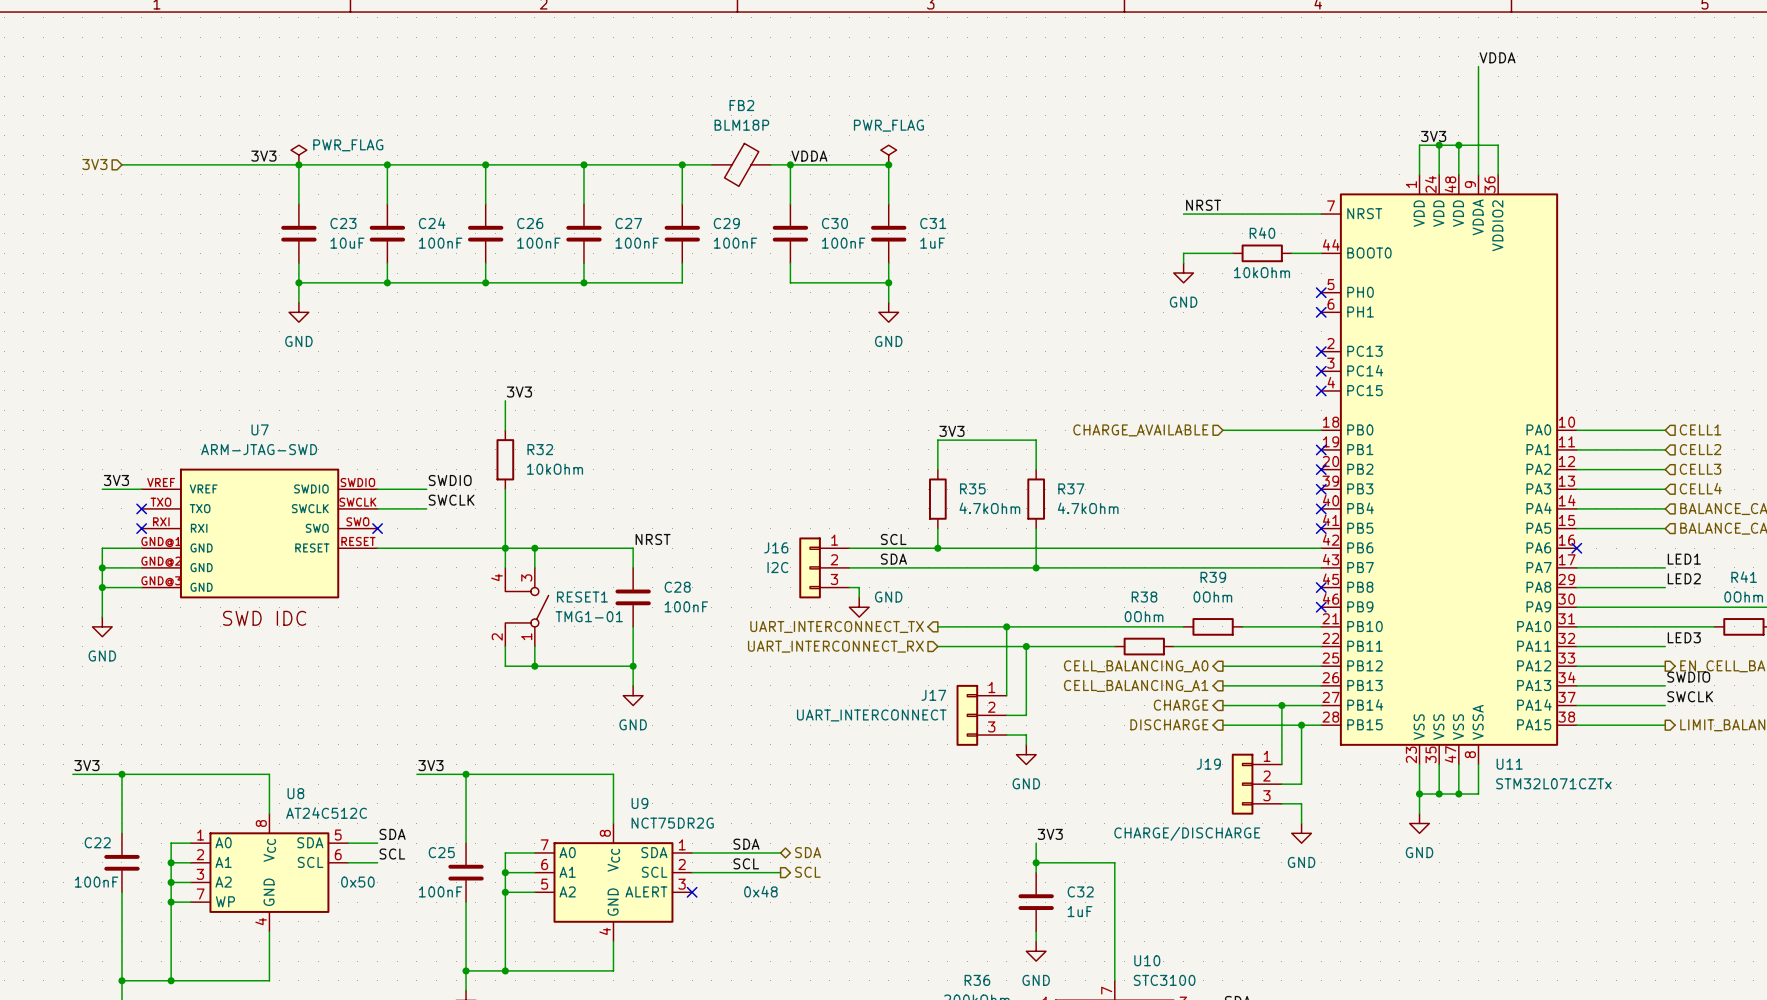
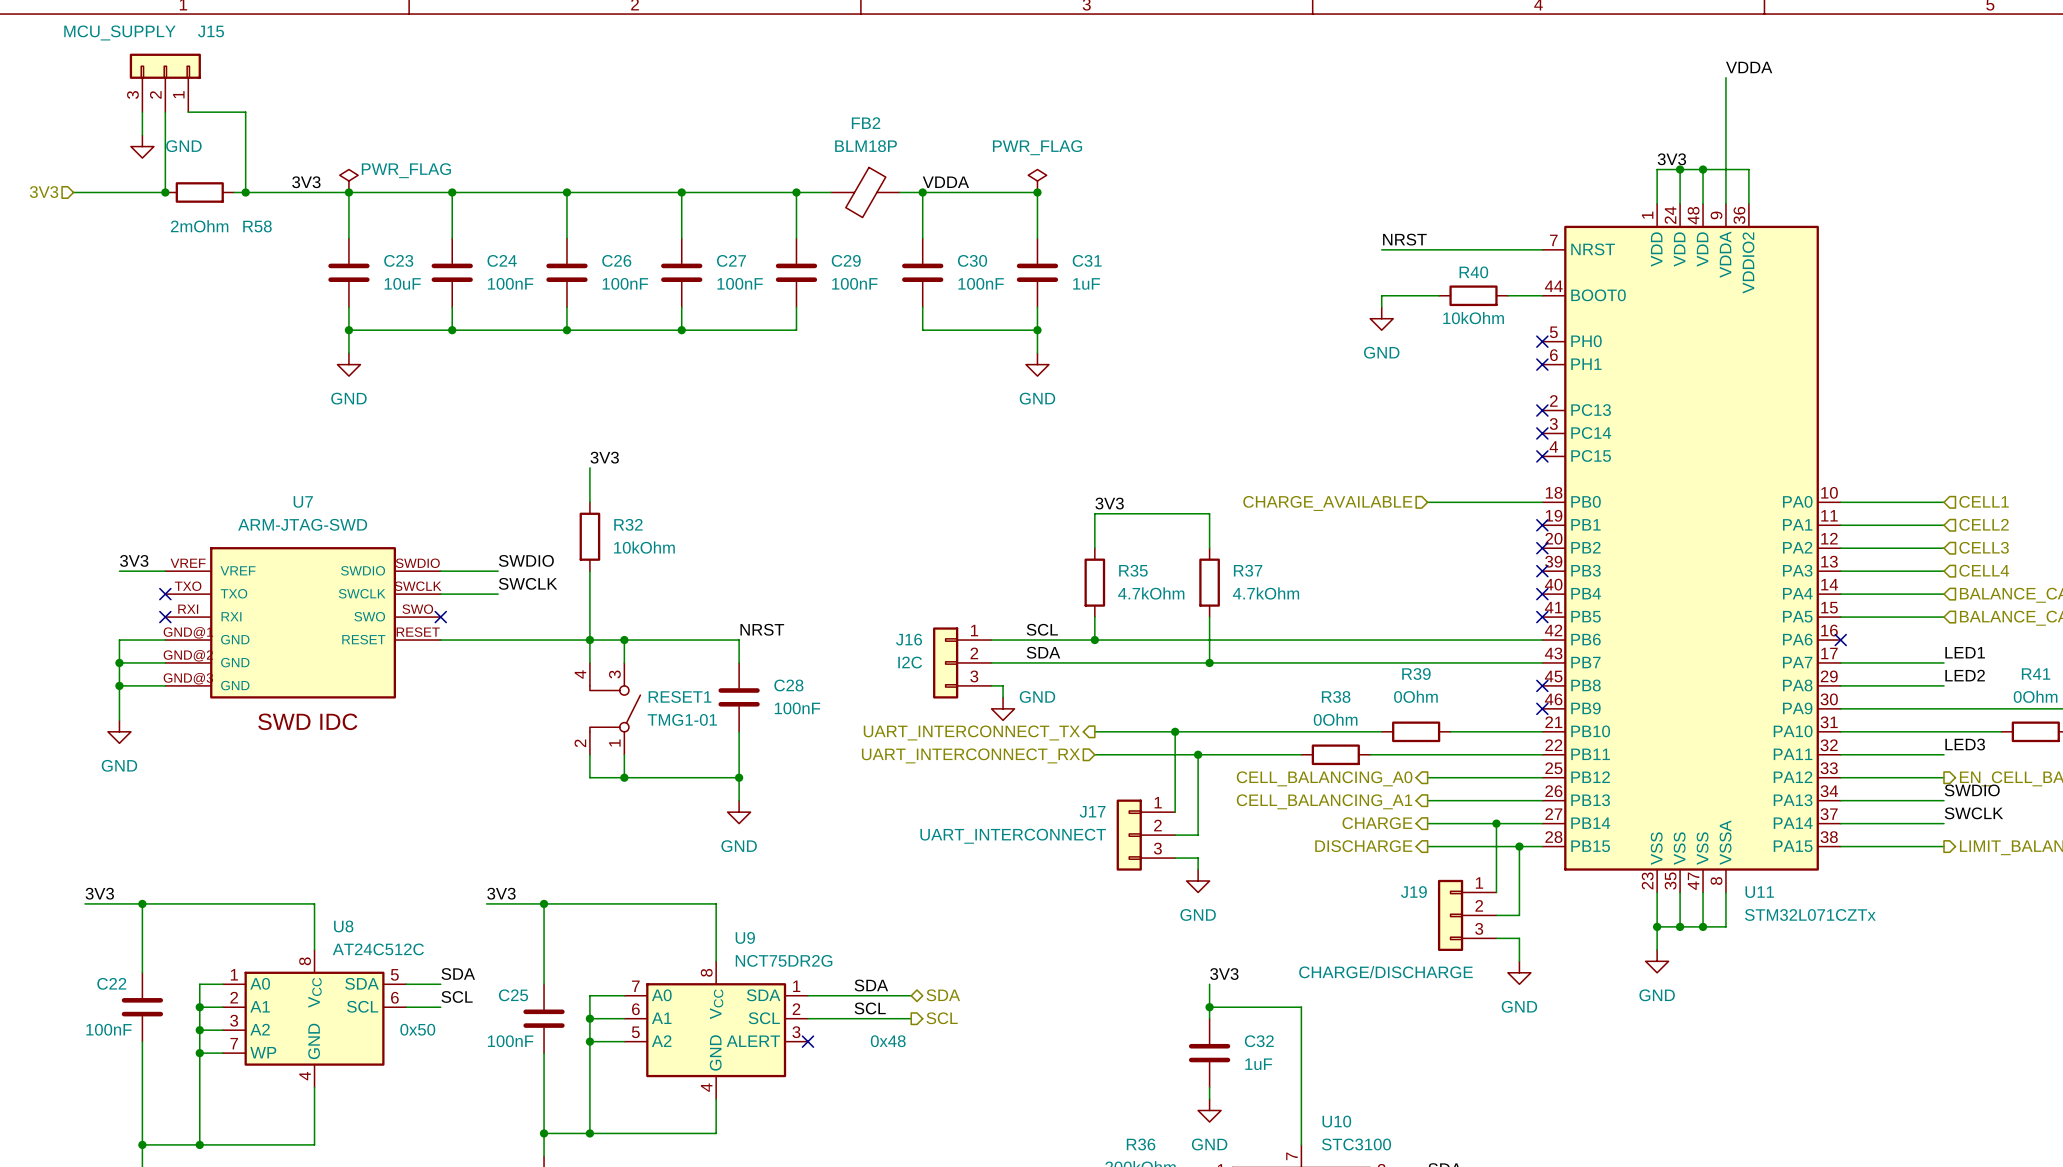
J15: none -> MCU_SUPPLY (165, 82)
wire: none -> (142, 112) (142, 135)
wire: none -> (188, 112) (245, 112) (245, 192)
power symbol: none -> GND (142, 146)
wire: none -> (73, 192) (142, 192)
hierarchical label position: 3V3 (94, 164) -> 3V3 (44, 192)
wire: (141, 164) (200, 164) -> (165, 192) (165, 112)
junction: none -> (165, 192)
R58: none -> 2mOhm (199, 192)
junction: none -> (245, 192)

